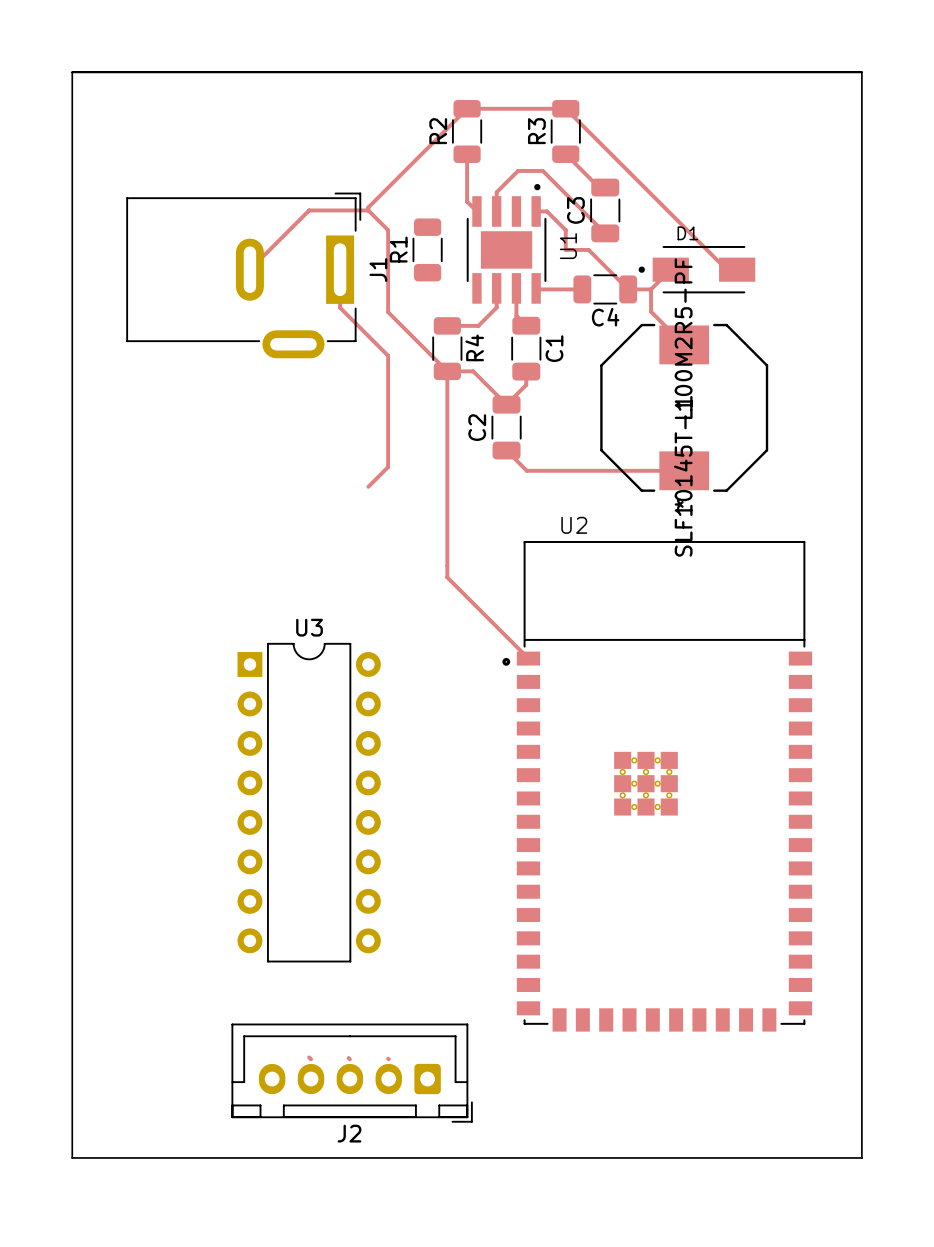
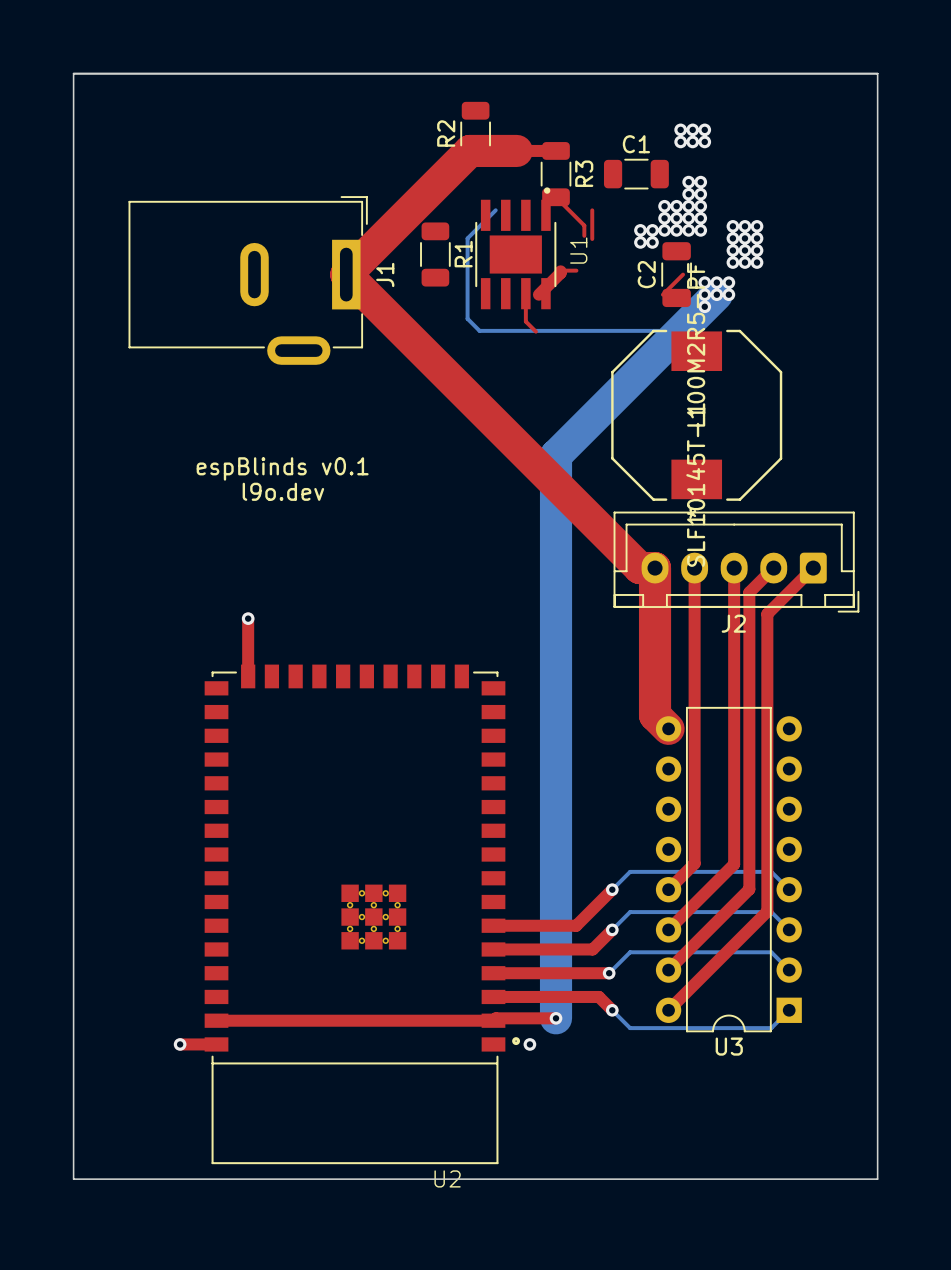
via: none -> (680, 129)
via: none -> (692, 129)
via: none -> (704, 129)
R3 name position: R3 (536, 131) -> R3 (584, 173)
R3 position: (565, 131) -> (556, 174)
via: none -> (680, 141)
via: none -> (692, 141)
via: none -> (704, 141)
top track: none -> (556, 150) (469, 150) (346, 274) (639, 568) (655, 568) (655, 715) (668, 728)
top track: (467, 154) (467, 201) (476, 211) -> none
top track: (565, 154) (599, 187) (605, 187) -> none
via: none -> (688, 182)
via: none -> (700, 182)
via: none -> (688, 194)
via: none -> (700, 194)
top track: none -> (556, 197) (584, 225) (584, 235)
via: none -> (664, 206)
via: none -> (676, 206)
via: none -> (688, 206)
via: none -> (700, 206)
bottom track: none -> (495, 210) (467, 238) (467, 318) (479, 330) (692, 330) (704, 318) (704, 306)
top track: none -> (592, 210) (592, 238)
top track: (368, 210) (309, 210) (249, 269) -> none
top track: (368, 210) (388, 230) (388, 312) (447, 371) -> none
top track: (368, 210) (368, 207) (467, 108) (565, 108) (726, 269) (737, 269) -> none
C3: (605, 210) -> none
top track: (496, 211) (496, 192) (517, 170) (542, 170) (605, 233) -> none
top track: (536, 211) (547, 211) (565, 230) (565, 249) (588, 249) (628, 289) (651, 289) (651, 311) (684, 344) -> none
via: none -> (664, 218)
via: none -> (676, 218)
via: none -> (688, 218)
via: none -> (700, 218)
via: none -> (732, 226)
via: none -> (744, 226)
via: none -> (757, 226)
via: none -> (640, 230)
via: none -> (652, 230)
via: none -> (664, 230)
via: none -> (676, 230)
via: none -> (688, 230)
via: none -> (700, 230)
via: none -> (732, 238)
via: none -> (744, 238)
via: none -> (757, 238)
via: none -> (640, 242)
via: none -> (652, 242)
via: none -> (732, 250)
via: none -> (744, 250)
via: none -> (757, 250)
R1 name position: R1 (398, 249) -> R1 (463, 254)
via: none -> (732, 262)
via: none -> (744, 262)
via: none -> (757, 262)
top track: none -> (559, 270) (576, 270)
top track: none -> (560, 271) (538, 294)
top track: (340, 269) (340, 307) (388, 355) (388, 467) (368, 486) -> none
D1: (696, 269) -> none
via: none -> (704, 282)
via: none -> (716, 282)
via: none -> (728, 282)
top track: (496, 288) (496, 307) (478, 325) (447, 325) -> none
top track: (536, 288) (582, 289) -> none
C4: (605, 289) -> none
via: none -> (704, 294)
bottom track: none -> (716, 294) (556, 455) (556, 1018)
via: none -> (716, 294)
via: none -> (728, 294)
via: none -> (704, 306)
R4: (447, 348) -> none
C1 rotation: 0° (526, 348) -> 90° clockwise (636, 174)
C1 position: (526, 348) -> (636, 174)
C1 name position: C1 (554, 348) -> C1 (636, 144)
top track: (447, 371) (473, 371) (506, 404) (526, 384) (526, 371) -> none
top track: (447, 371) (447, 577) (528, 658) -> none
C2 position: (506, 427) -> (676, 274)
top track: (506, 450) (526, 470) (684, 470) -> none
text: none -> espBlinds v0.1 (282, 468)
text: none -> l9o.dev (283, 491)
top track: none -> (694, 568) (694, 863) (668, 889)
top track: none -> (734, 568) (734, 864) (668, 929)
top track: none -> (773, 568) (749, 592) (749, 889) (668, 970)
top track: none -> (813, 568) (767, 614) (767, 911) (668, 1010)
top track: none -> (248, 618) (248, 676)
via: none -> (248, 618)
U2 rotation: 0° (657, 786) -> 180° (362, 914)
U2 position: (657, 786) -> (362, 914)
U3 rotation: 0° (309, 802) -> 180° (728, 869)
U3 position: (309, 802) -> (728, 869)
top track: none -> (612, 889) (576, 925) (493, 925)
bottom track: none -> (612, 889) (630, 871) (771, 871) (789, 889)
via: none -> (612, 889)
top track: none -> (612, 929) (592, 949) (493, 949)
bottom track: none -> (612, 929) (630, 912) (771, 912) (789, 929)
via: none -> (612, 929)
bottom track: none -> (789, 970) (771, 952) (630, 952) (609, 973)
top track: none -> (493, 973) (609, 973)
via: none -> (609, 973)
top track: none -> (493, 996) (598, 996) (612, 1010)
bottom track: none -> (612, 1010) (630, 1028) (771, 1028) (789, 1010)
via: none -> (612, 1010)
top track: none -> (556, 1018) (495, 1018) (493, 1020) (216, 1020)
via: none -> (556, 1018)
top track: none -> (180, 1044) (216, 1044)
via: none -> (180, 1044)
via: none -> (529, 1044)
top track: (309, 1057) (311, 1059) -> none
top track: (348, 1058) (349, 1059) -> none
top track: (388, 1058) (388, 1059) -> none
J2 position: (352, 1073) -> (736, 562)

